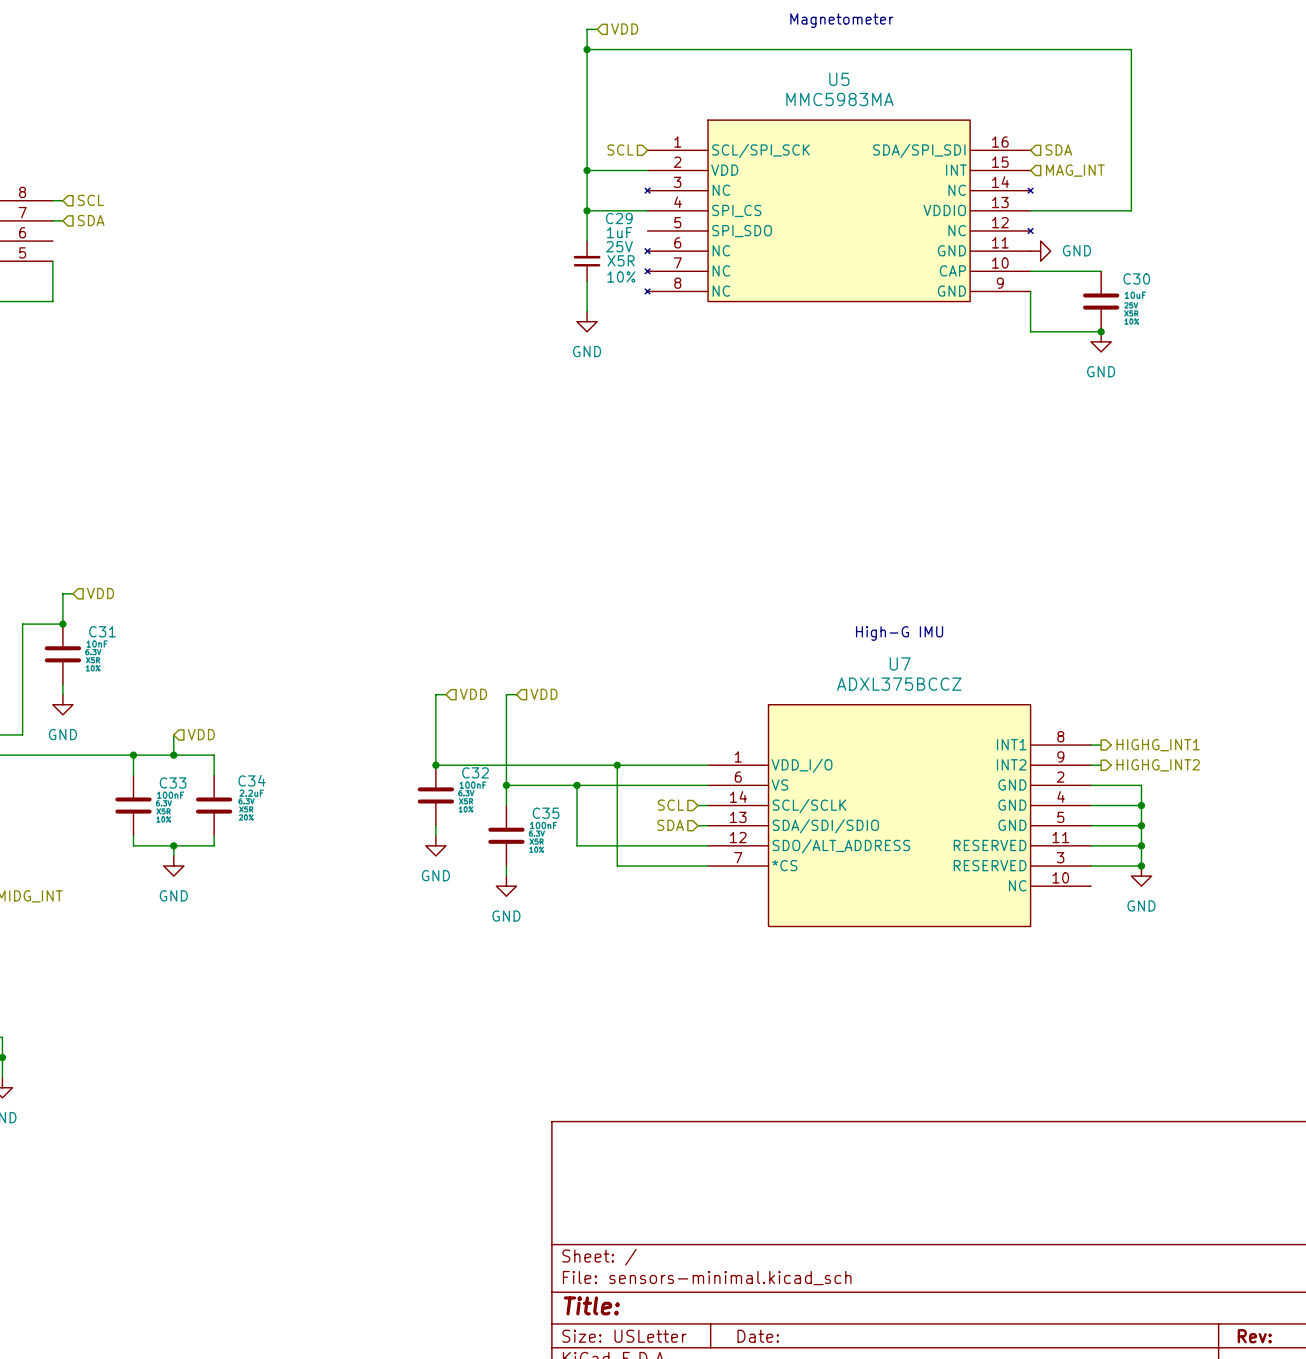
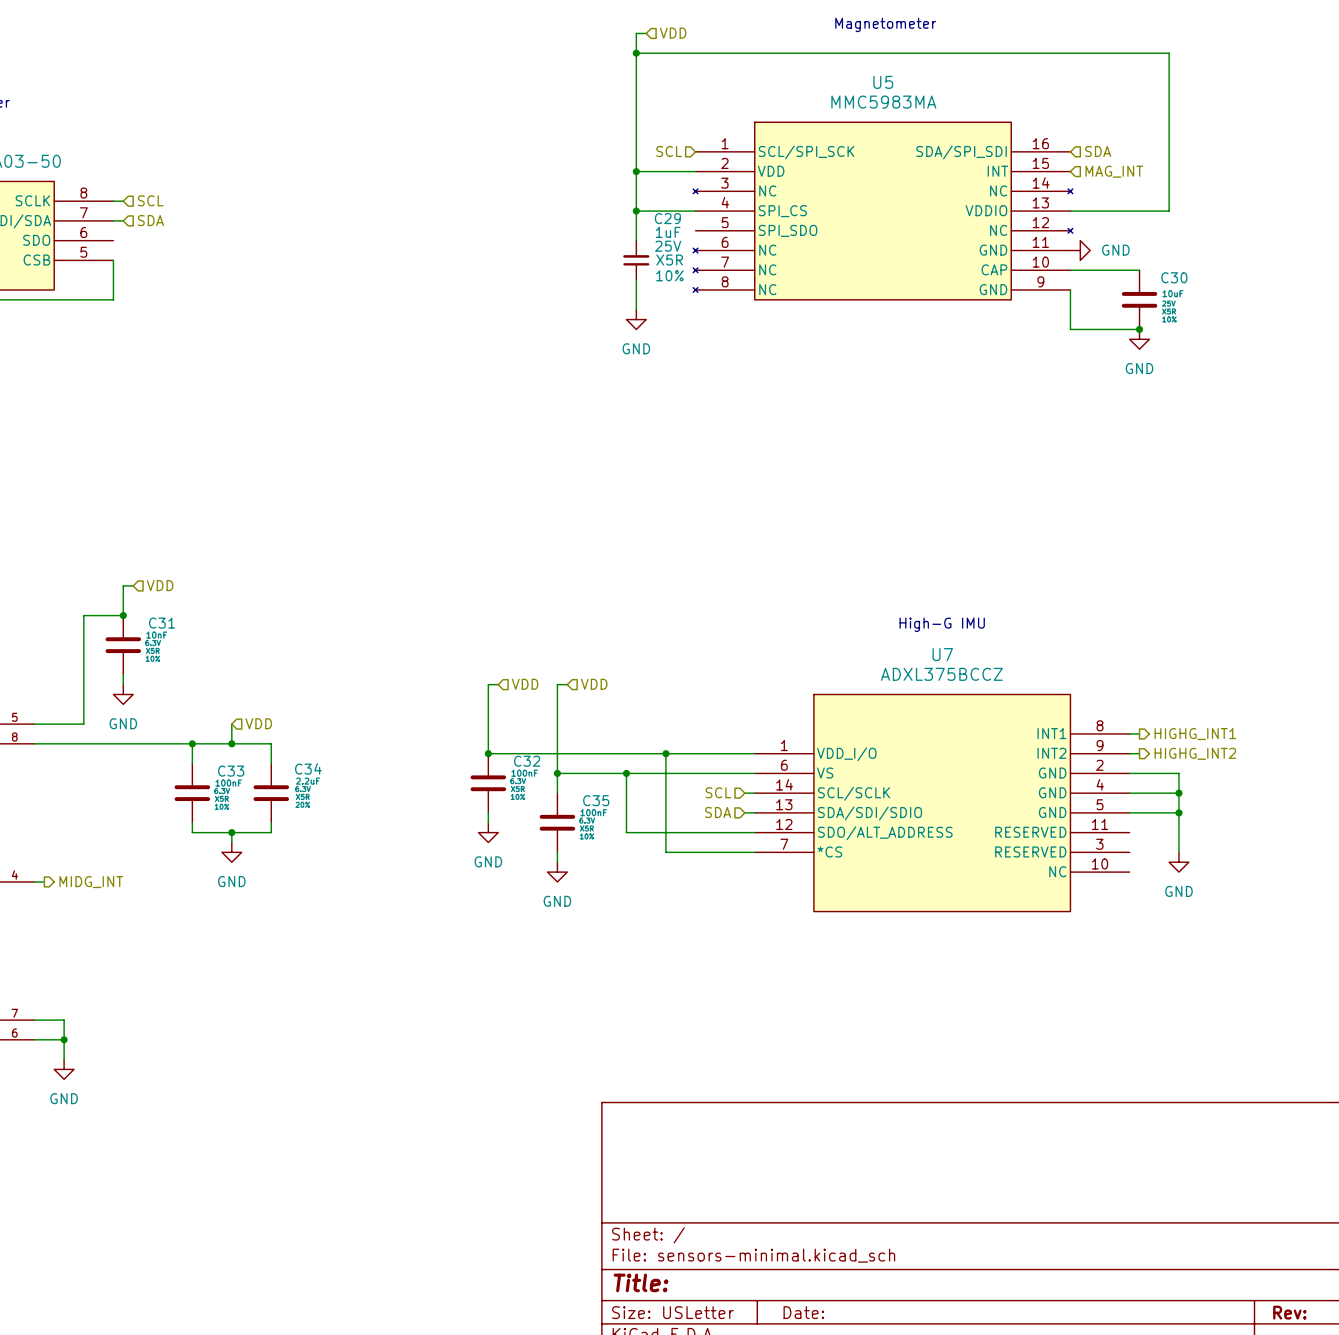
wire: (1091, 845) (1141, 845) -> none
junction: (1141, 845) -> none
wire: (1091, 866) (1141, 866) -> none
junction: (1141, 866) -> none

